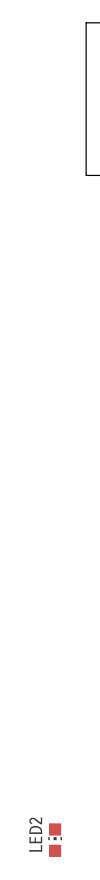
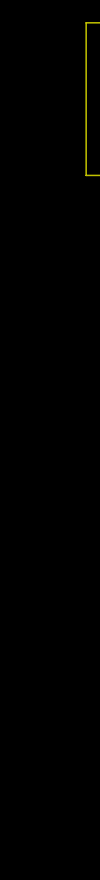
LED2: (55, 840) -> none

